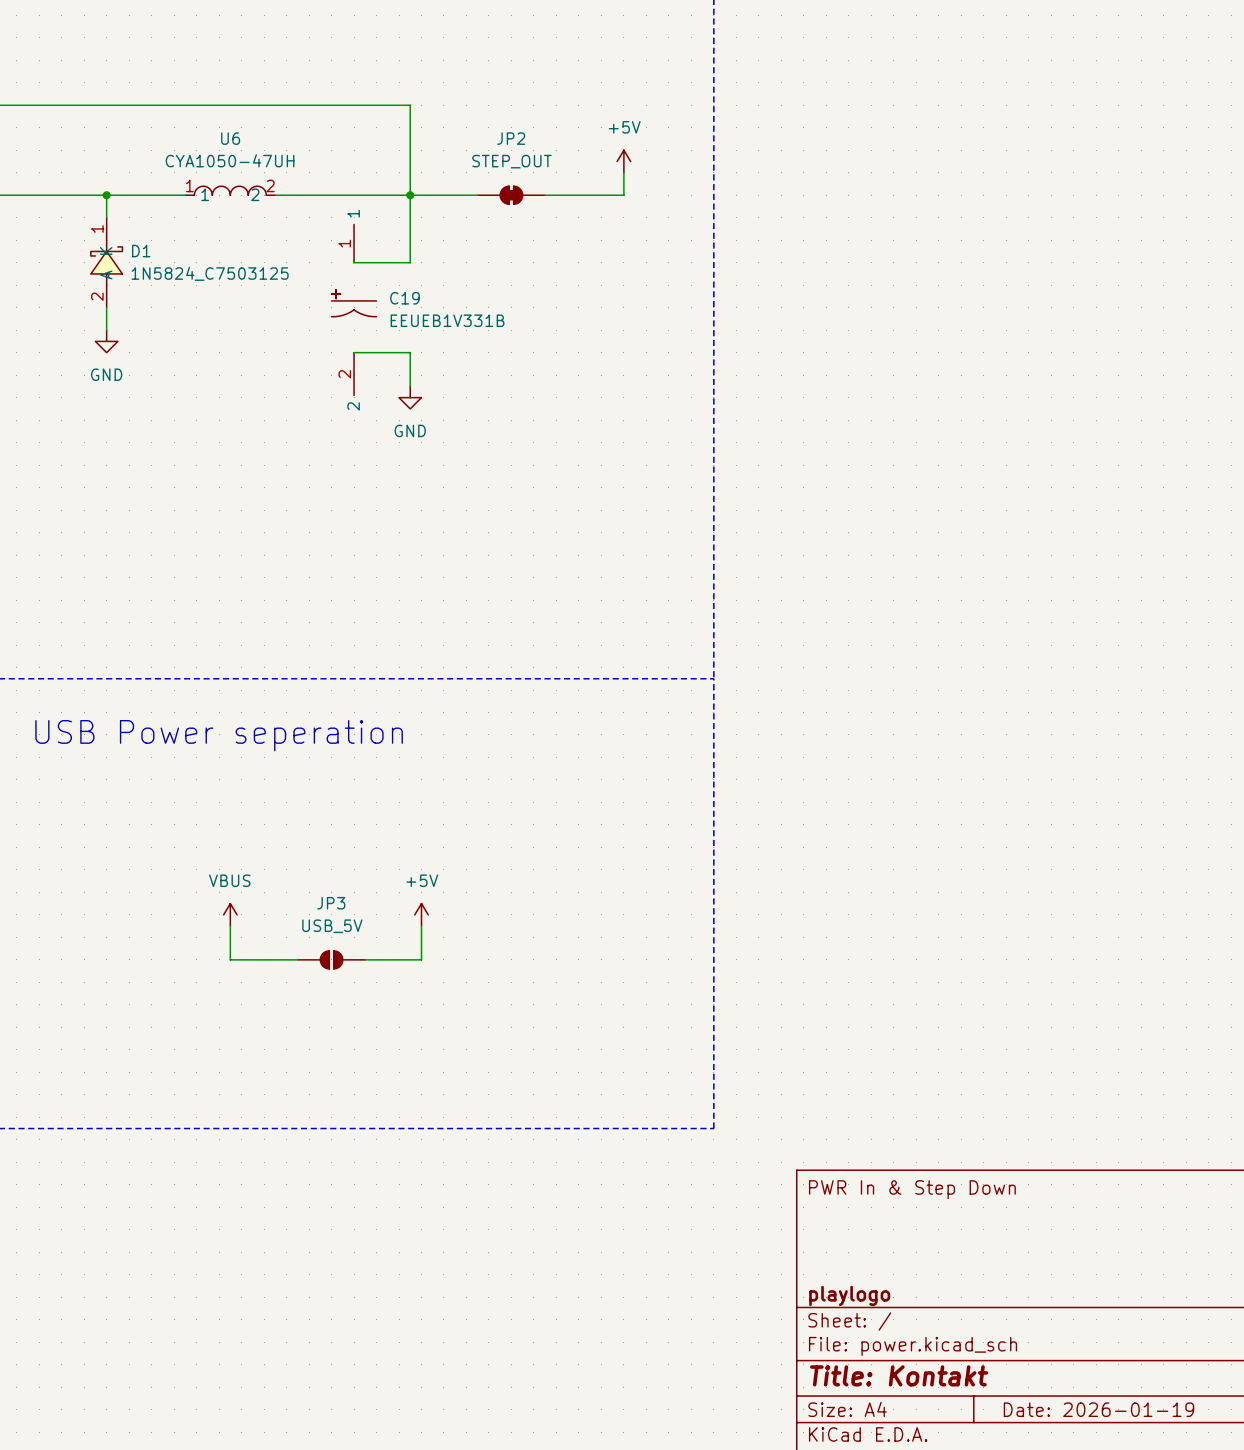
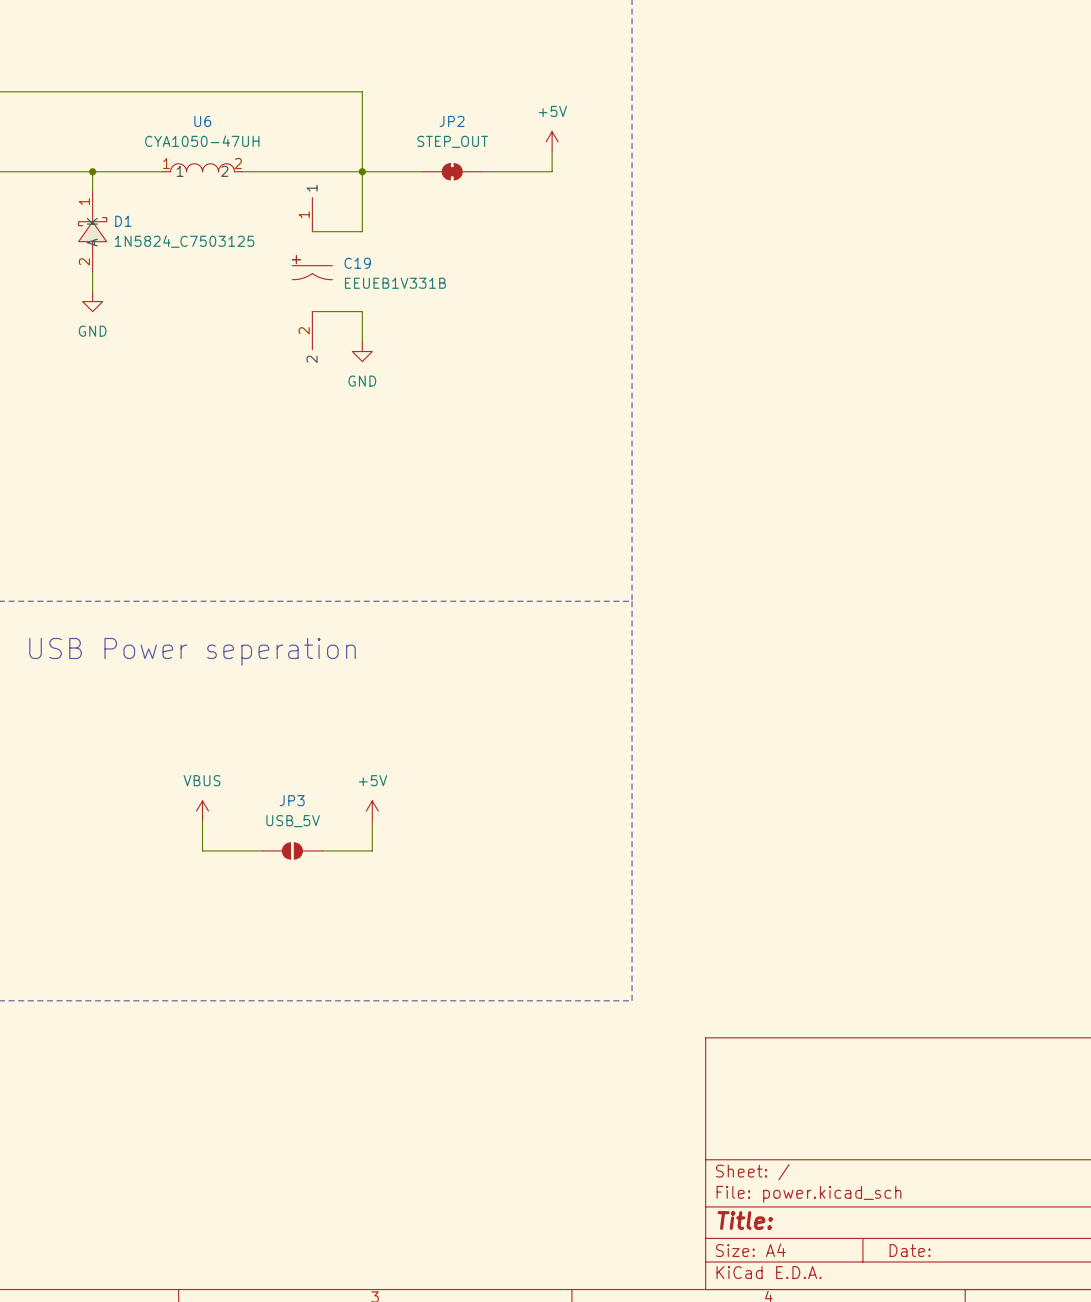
title block: PWR In & Step Down (912, 1189) -> none
title block: playlogo (849, 1295) -> none
title block: Title: Kontakt (899, 1375) -> Title: (745, 1220)
title block: Date: 2026-01-19 (1098, 1409) -> Date: (910, 1250)

